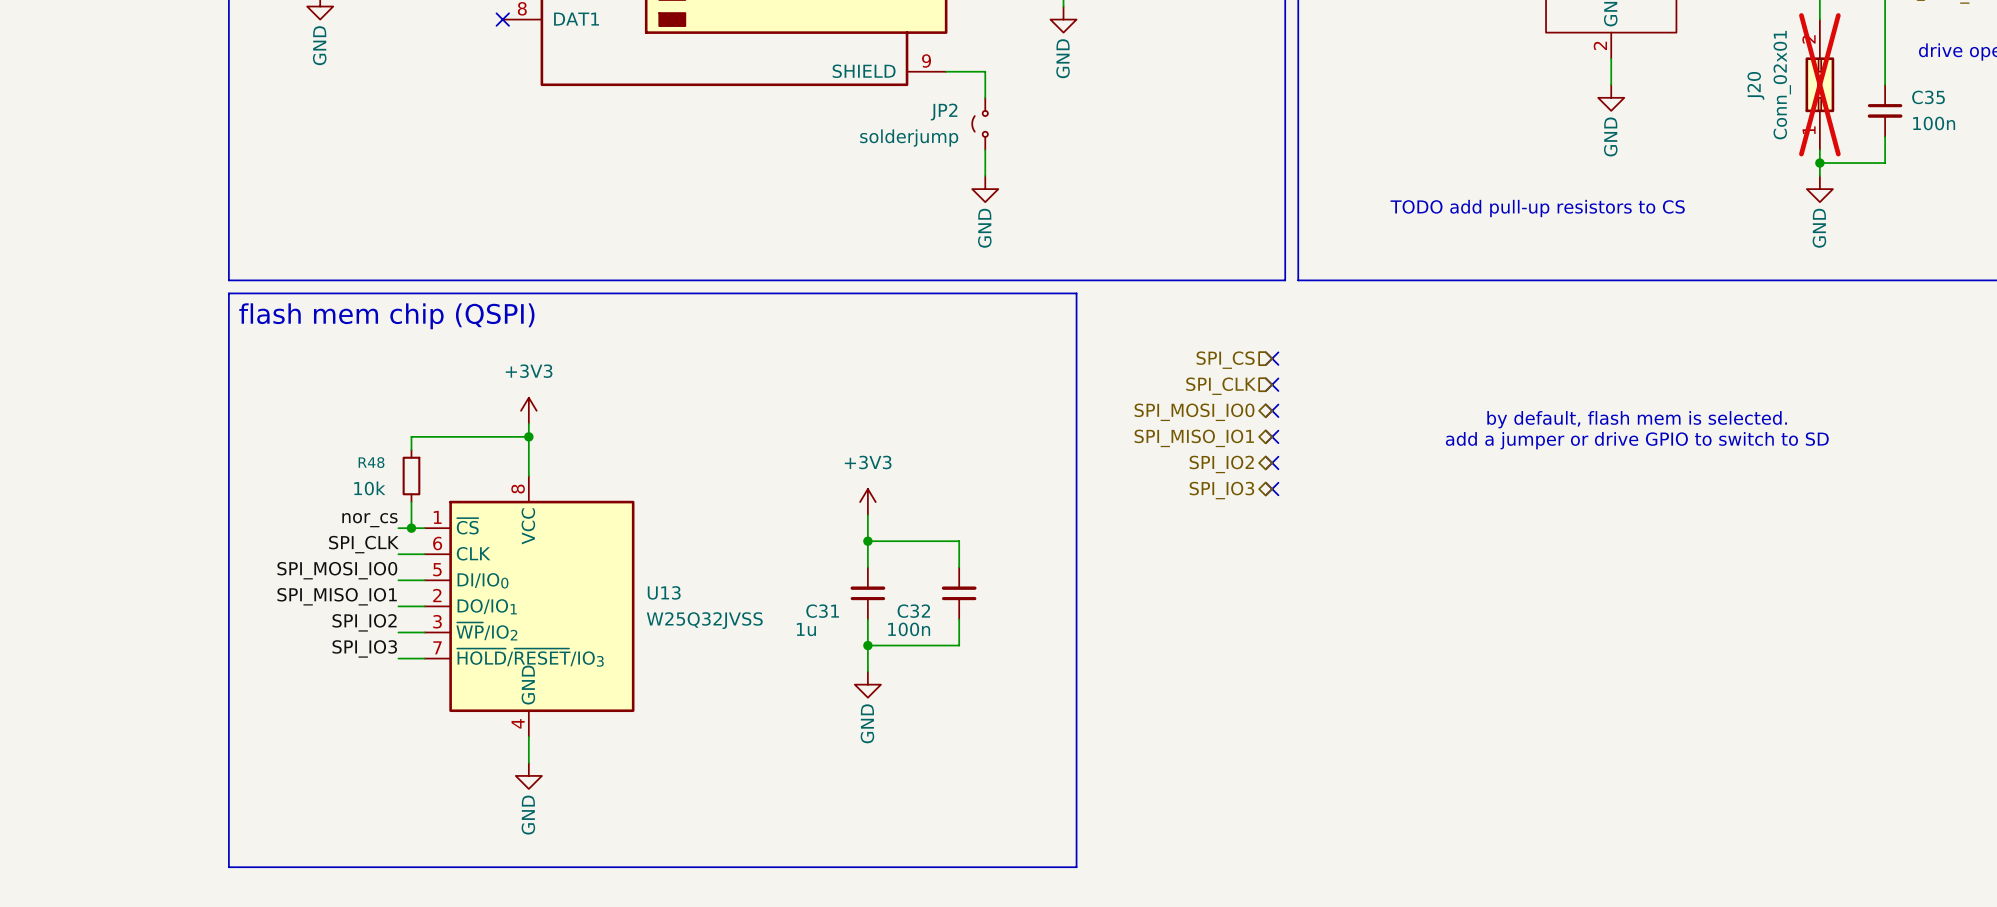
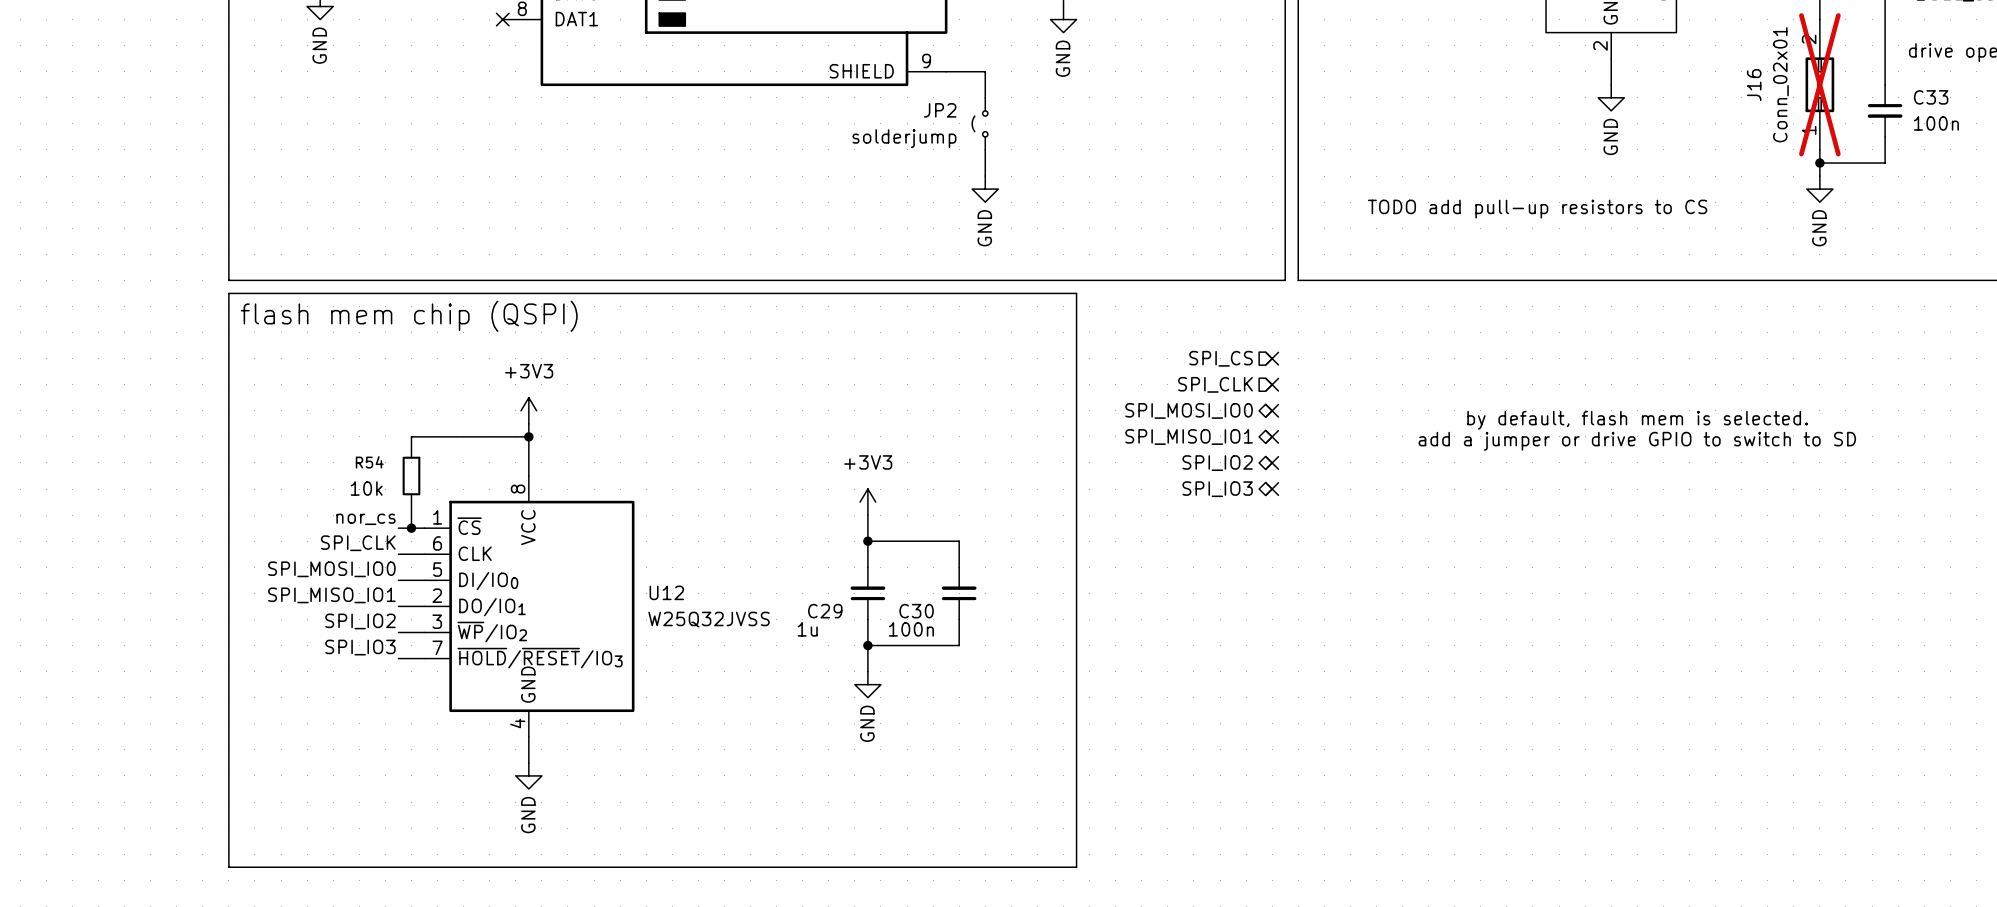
J20 name: J20 (1755, 85) -> J16 (1754, 85)
C35 name: C35 (1928, 97) -> C33 (1931, 97)
R48 name: R48 (371, 462) -> R54 (369, 462)
U13 name: U13 (664, 592) -> U12 (666, 592)
C31 name: C31 (822, 611) -> C29 (825, 611)
C32 name: C32 (913, 611) -> C30 (916, 611)

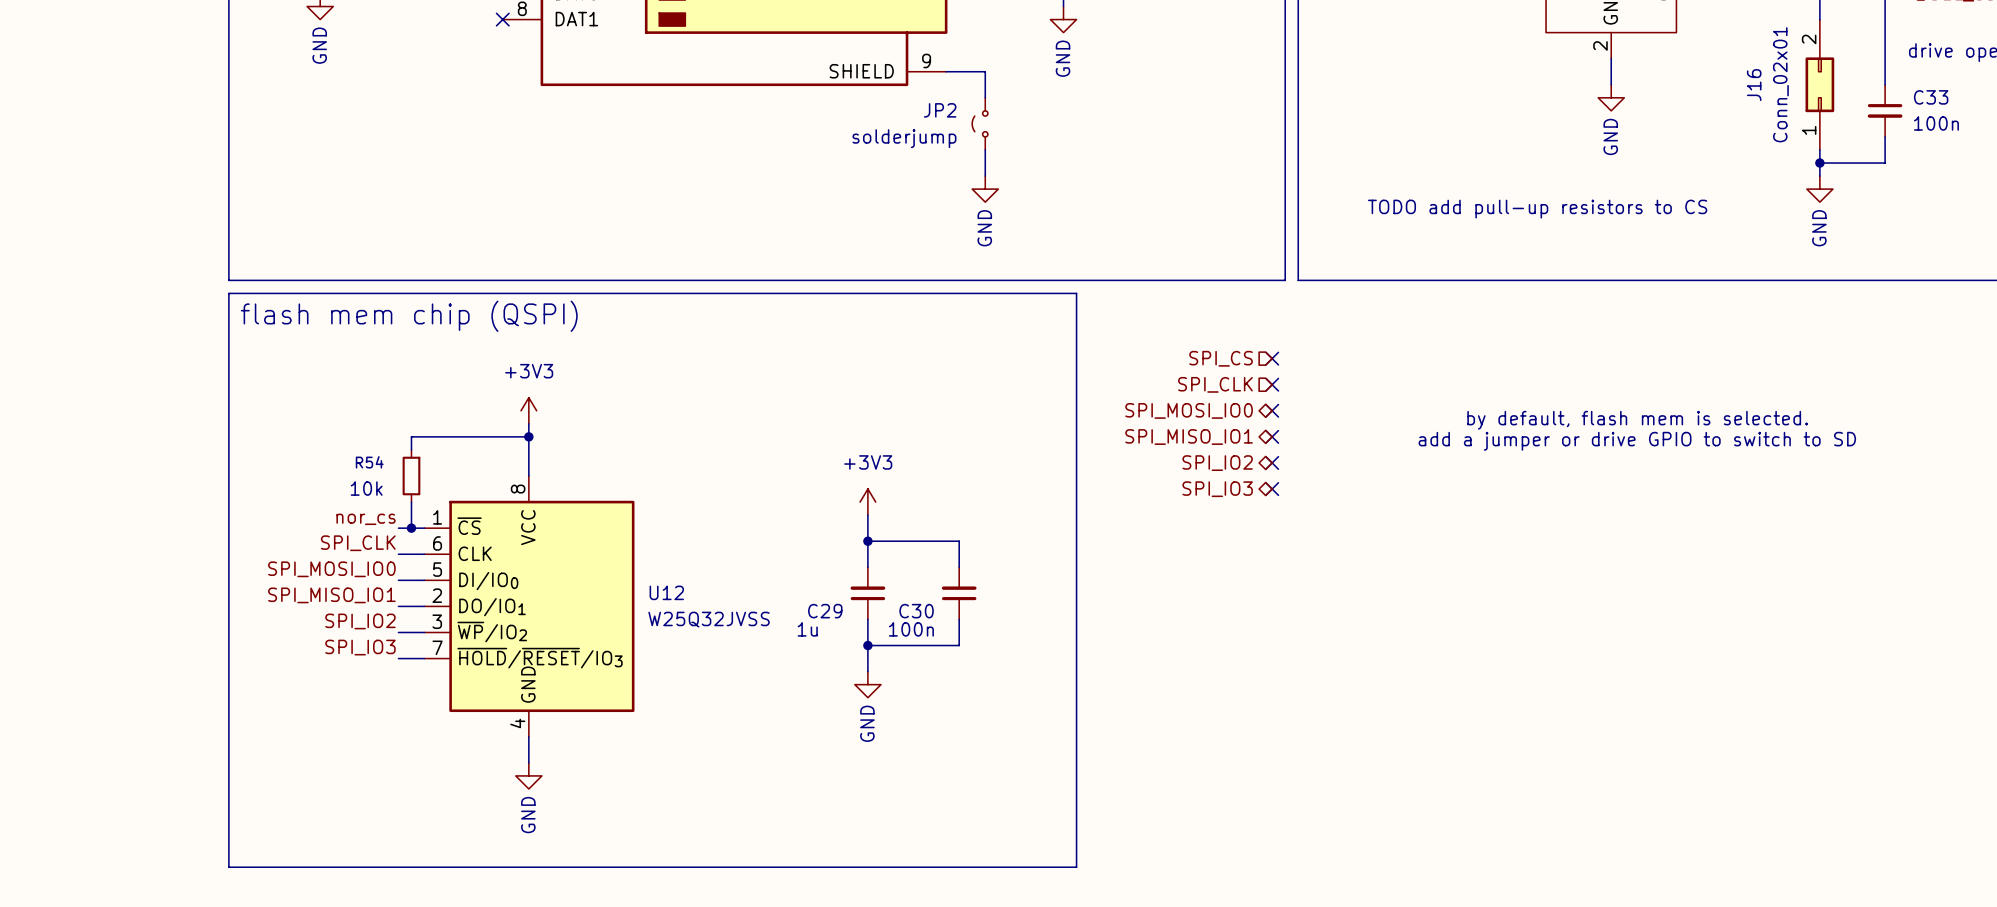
J16 do-not-place cross: (1819, 84) -> none

